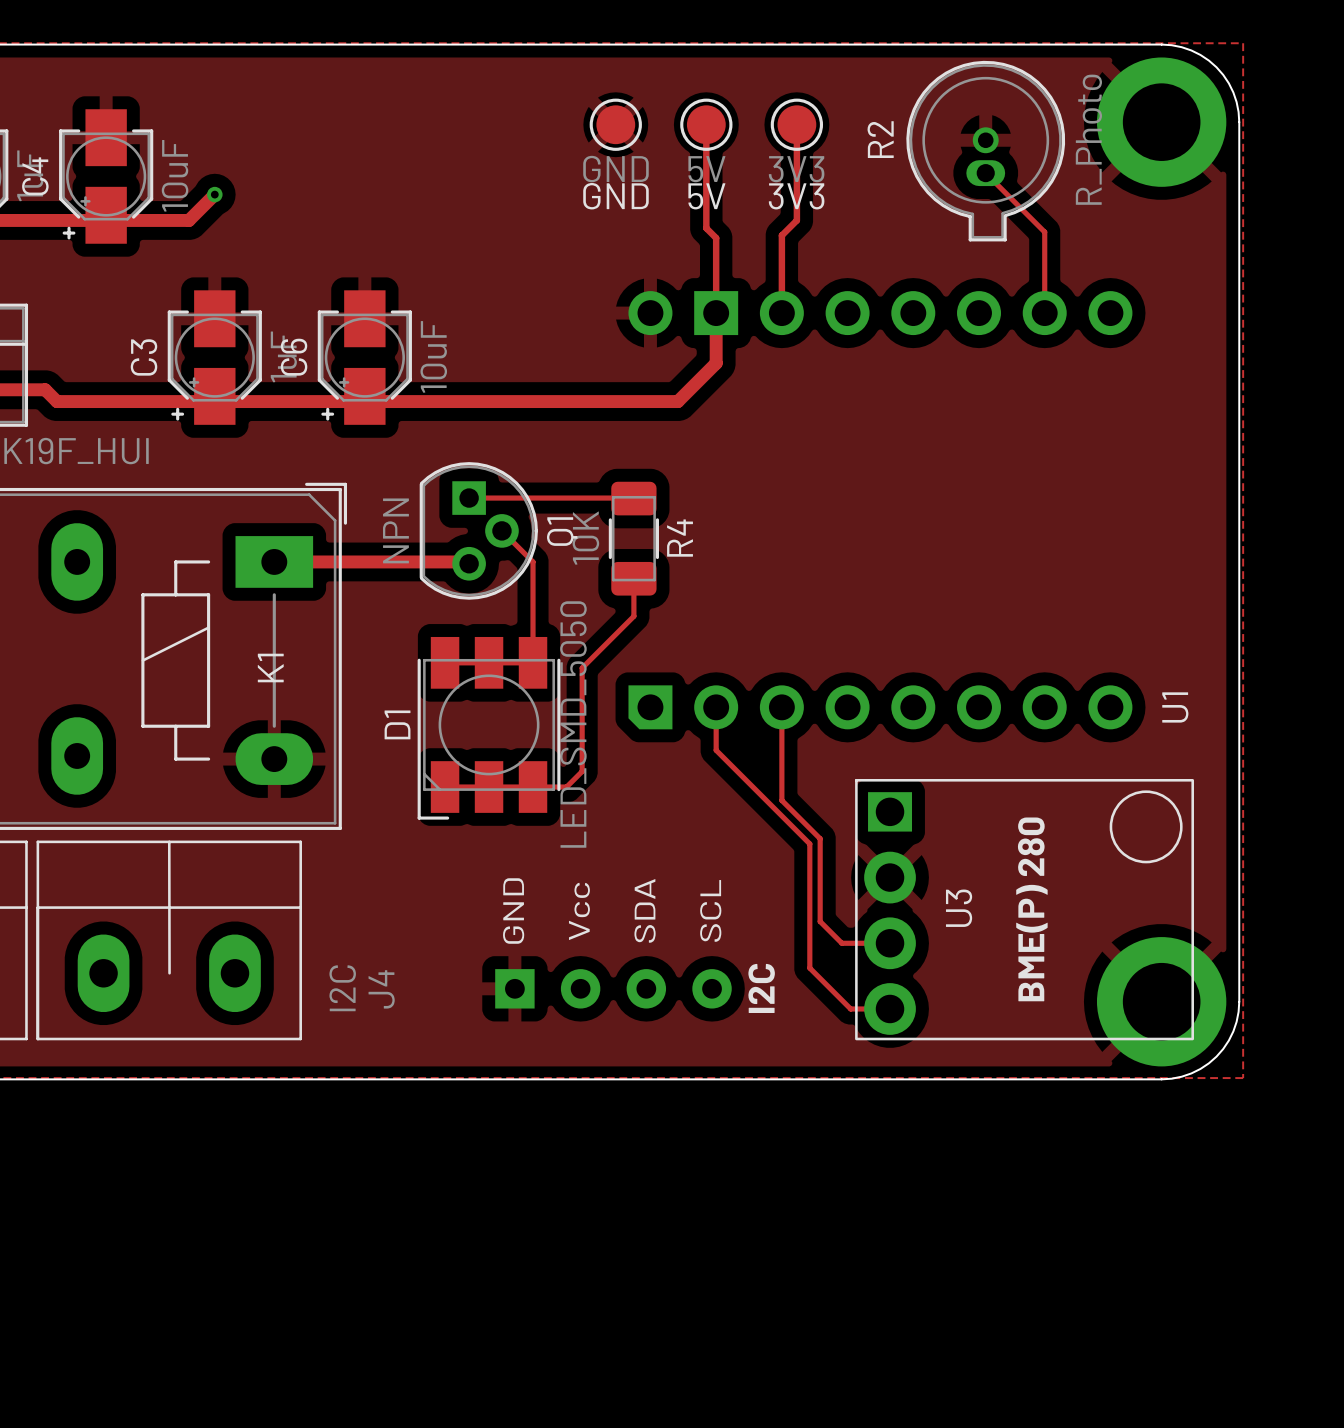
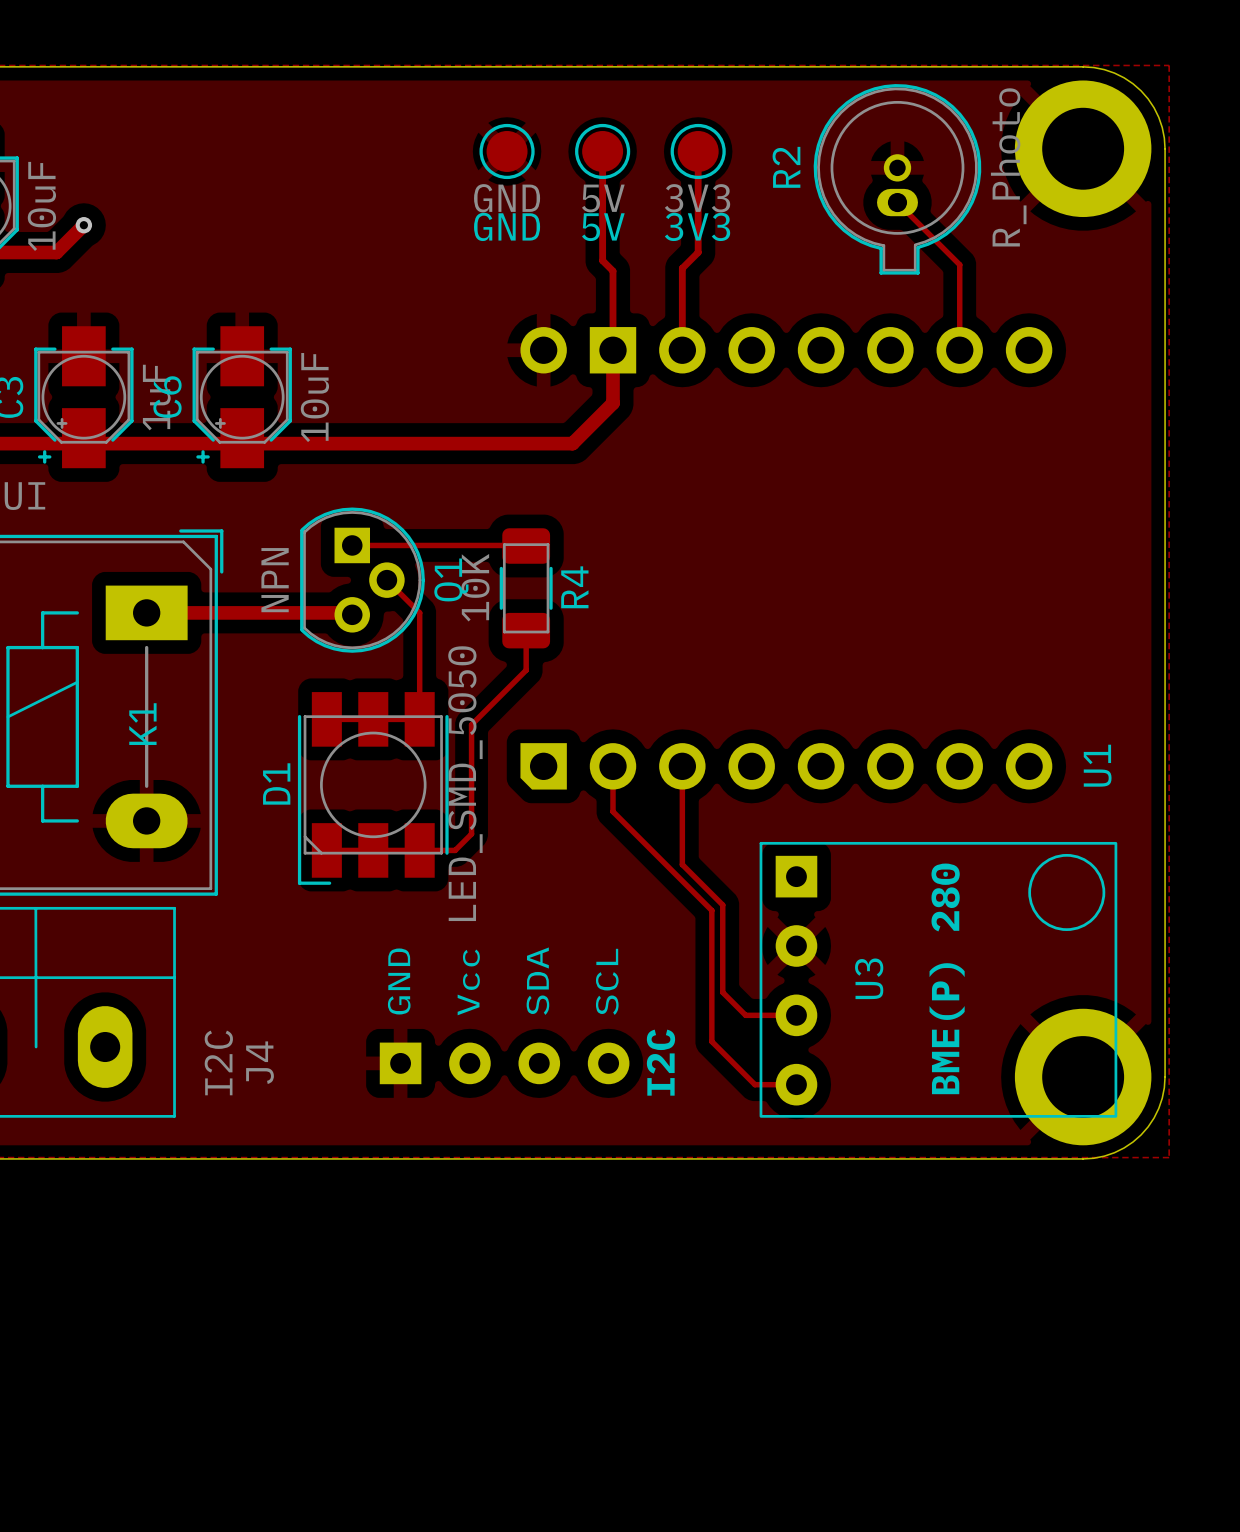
U3 footprint: [855, 779, 1194, 1041] -> [759, 841, 1118, 1118]

